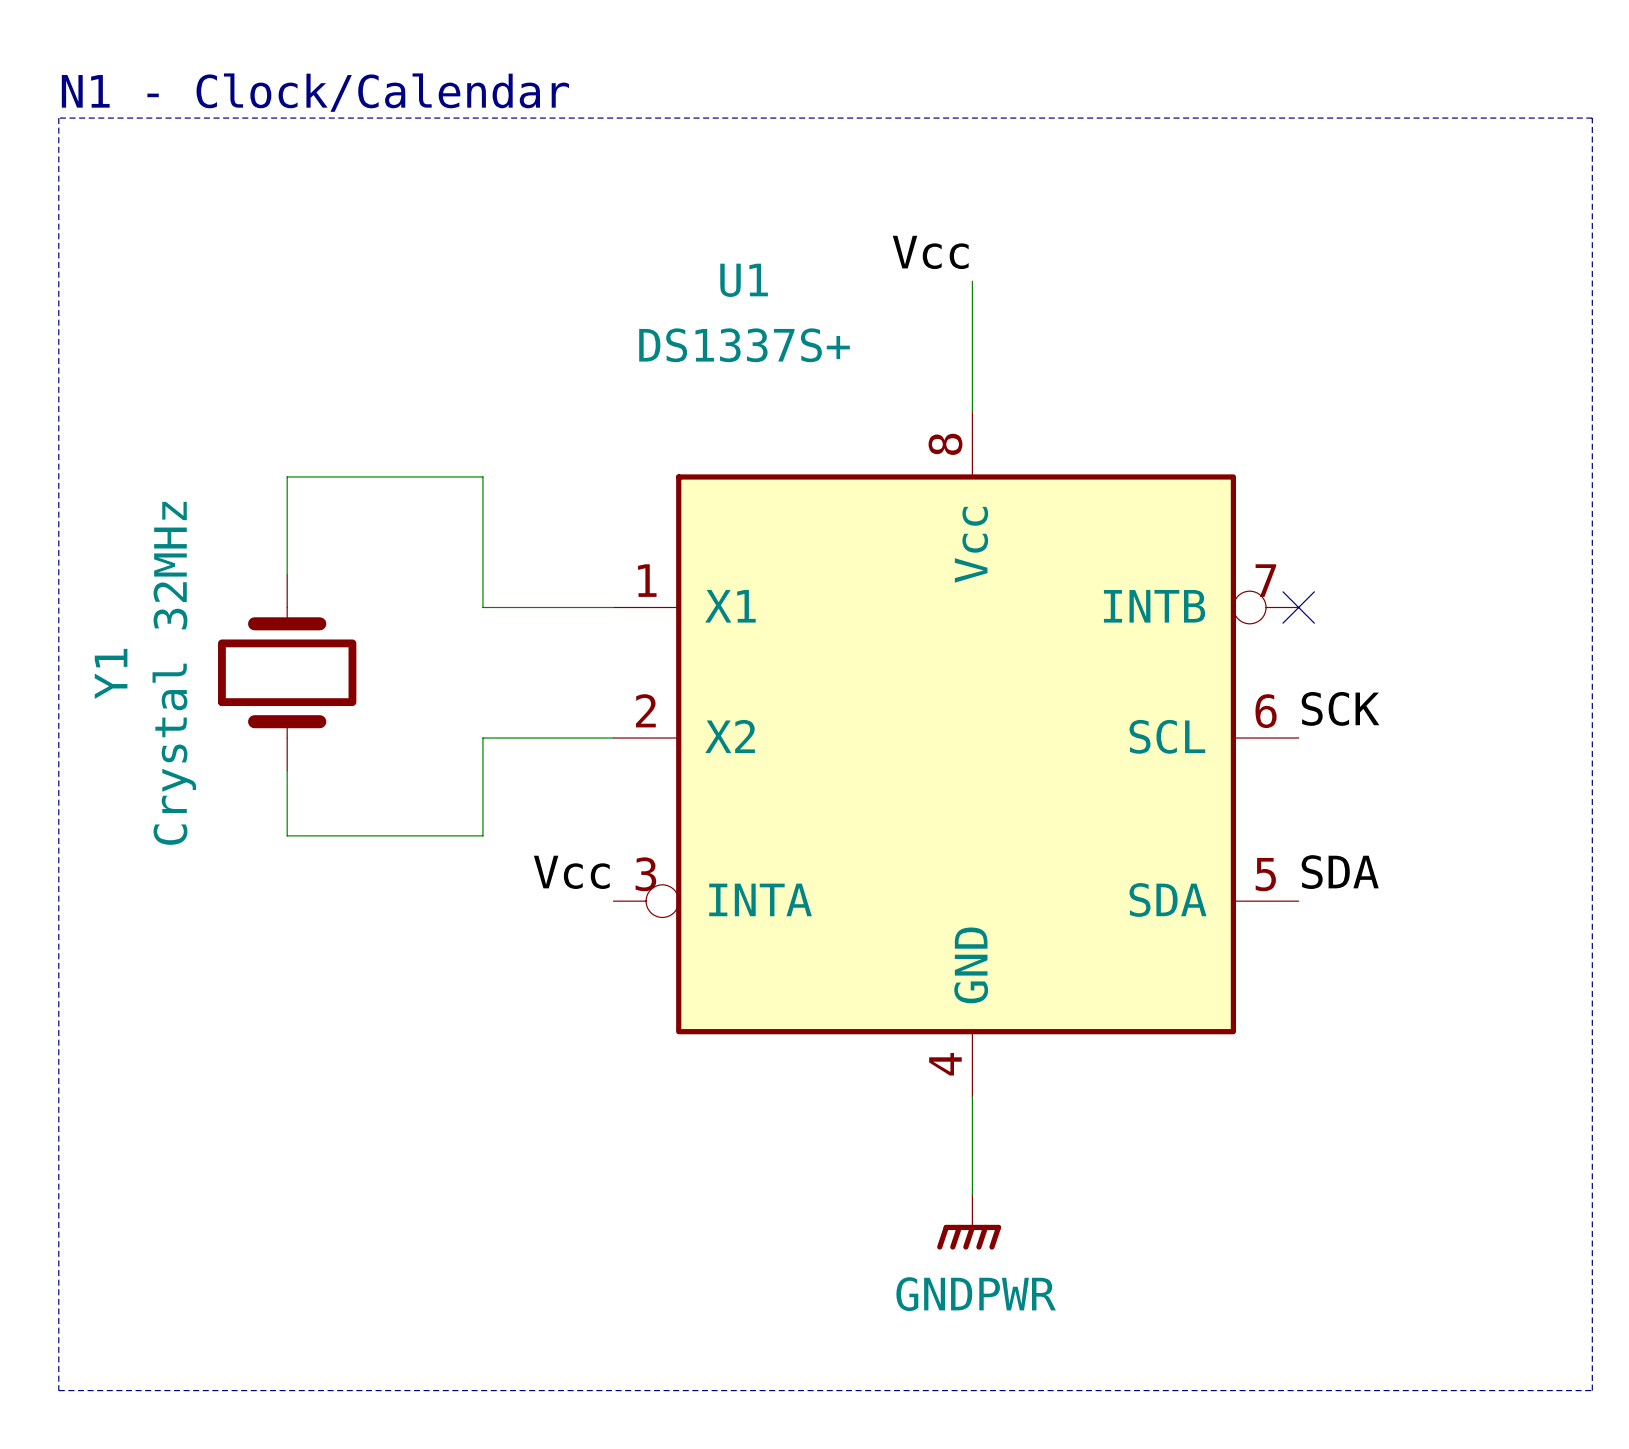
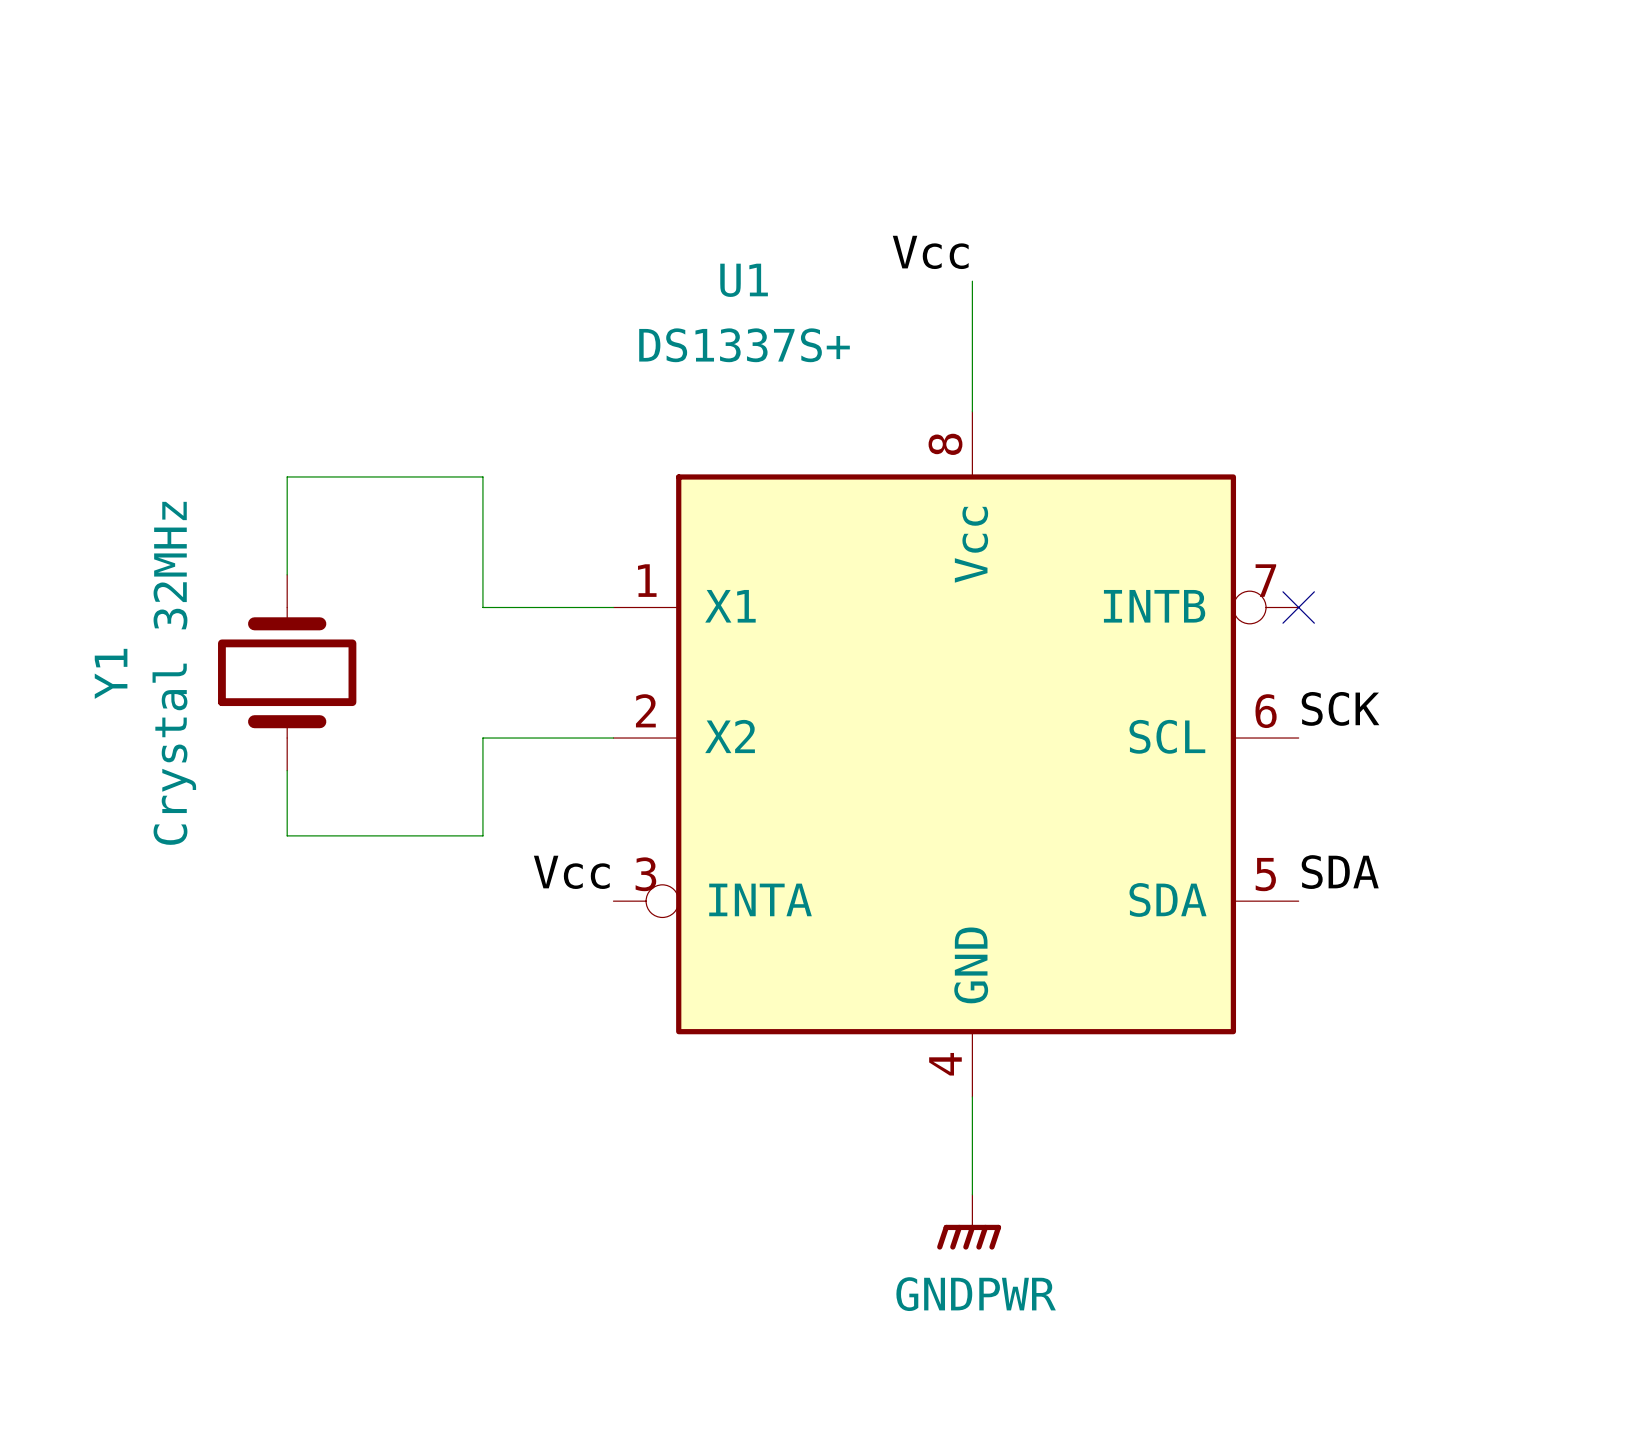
text: N1 - Clock/Calendar (315, 92) -> none
line: (58, 118) (1592, 118) (1592, 1390) (58, 1390) (58, 118) -> none

